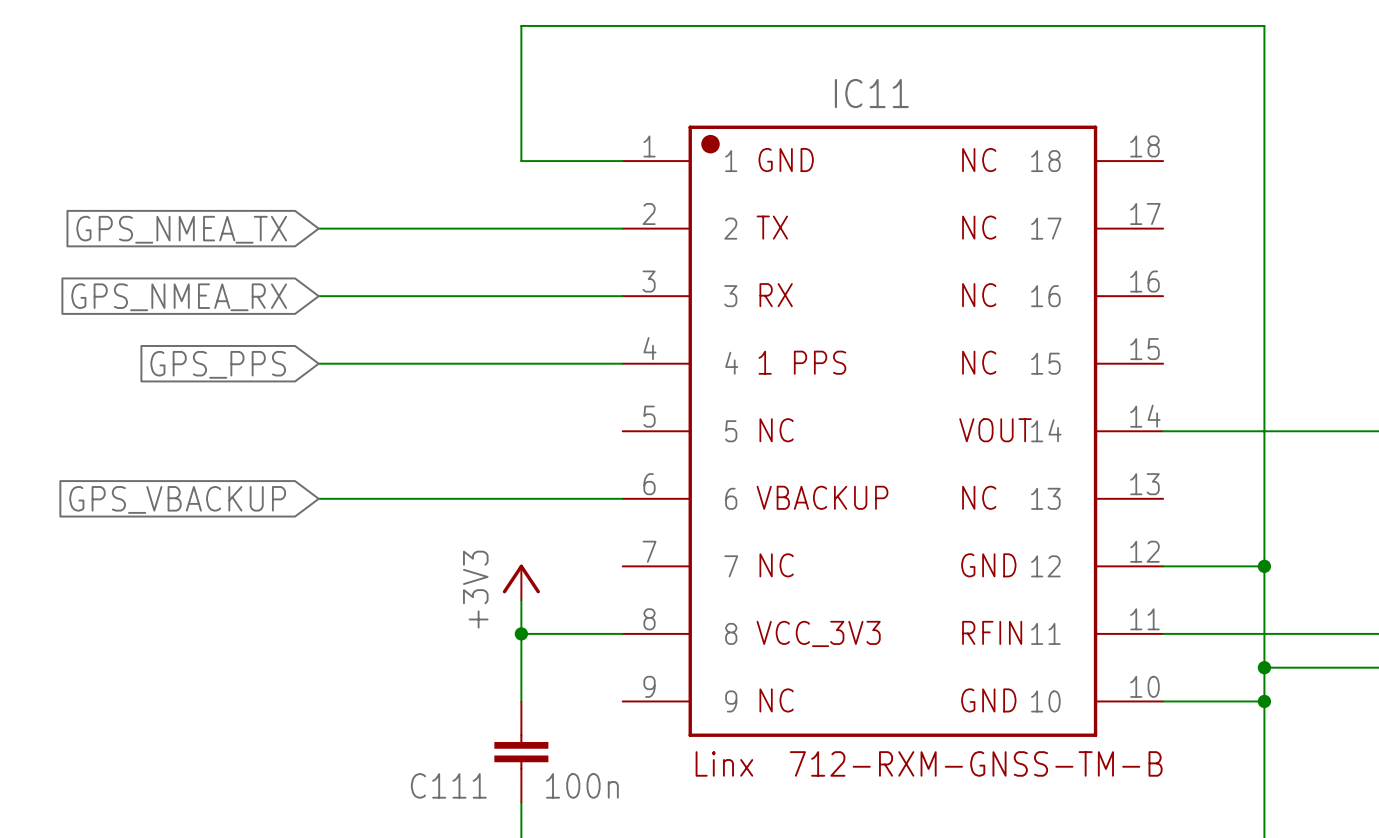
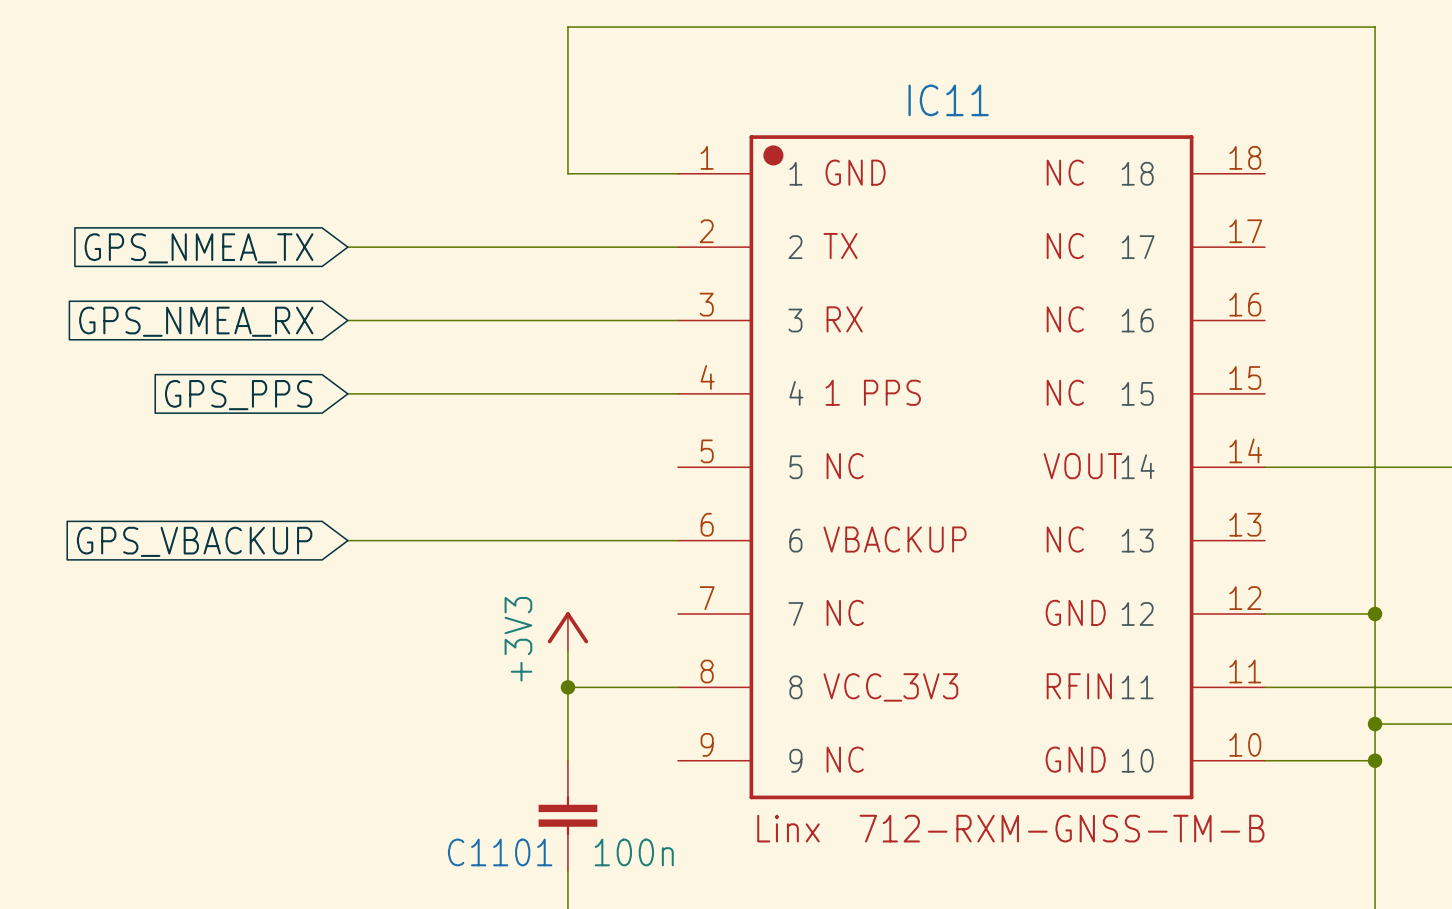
C111 name: C111 (448, 785) -> C1101 (500, 852)

